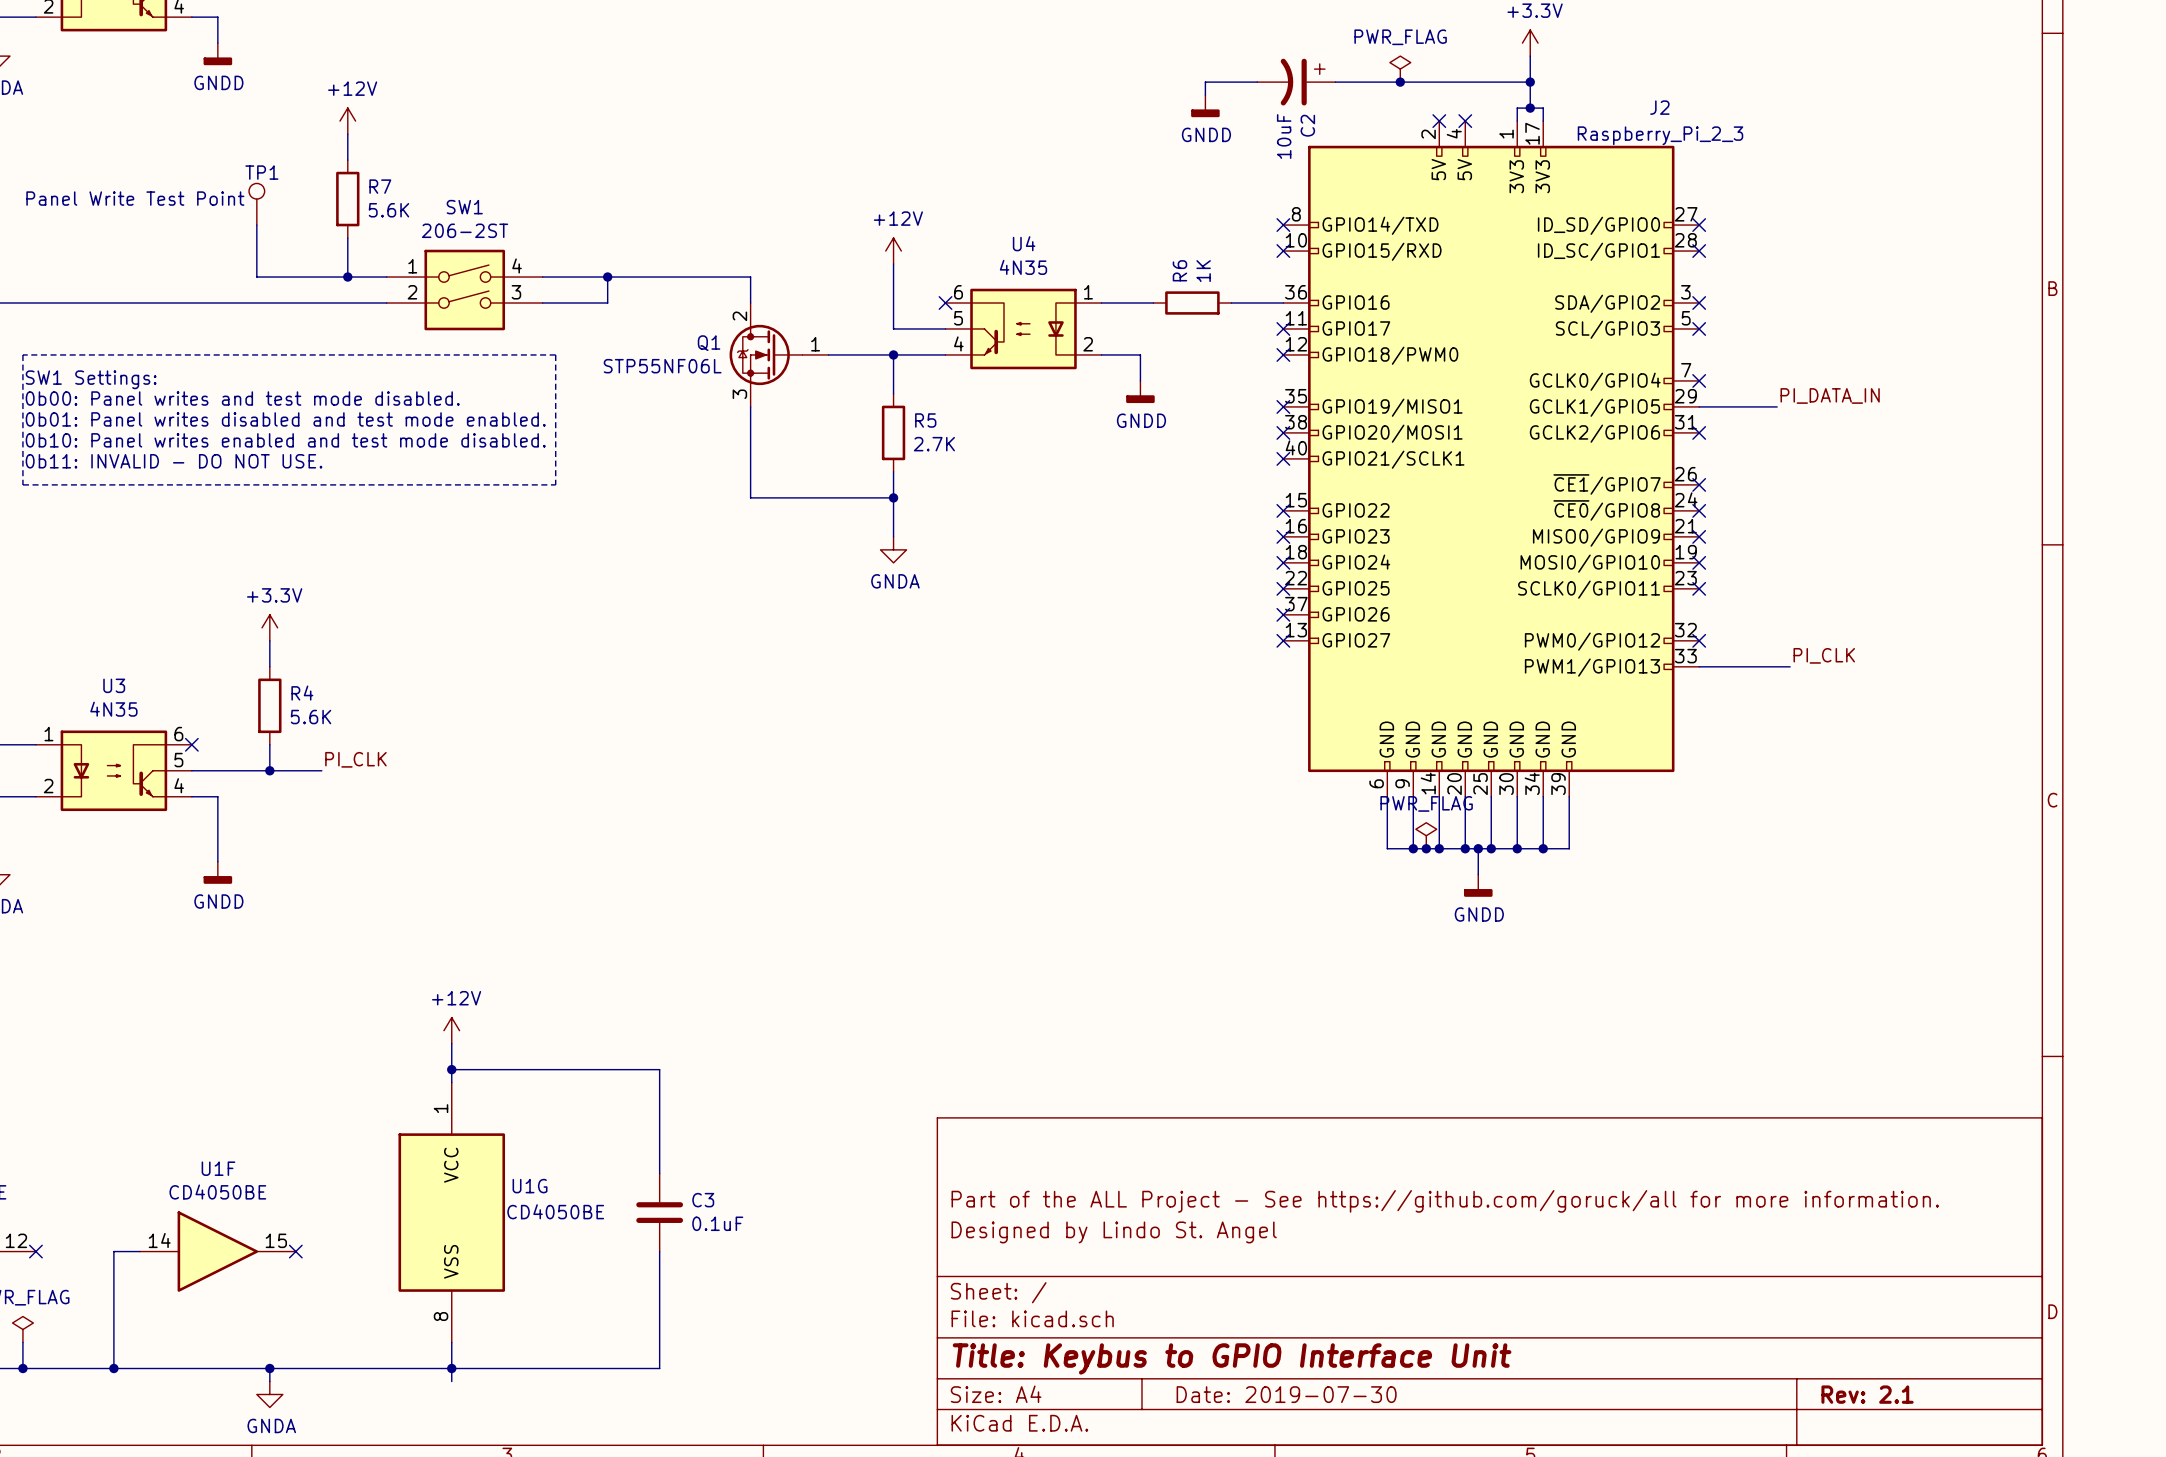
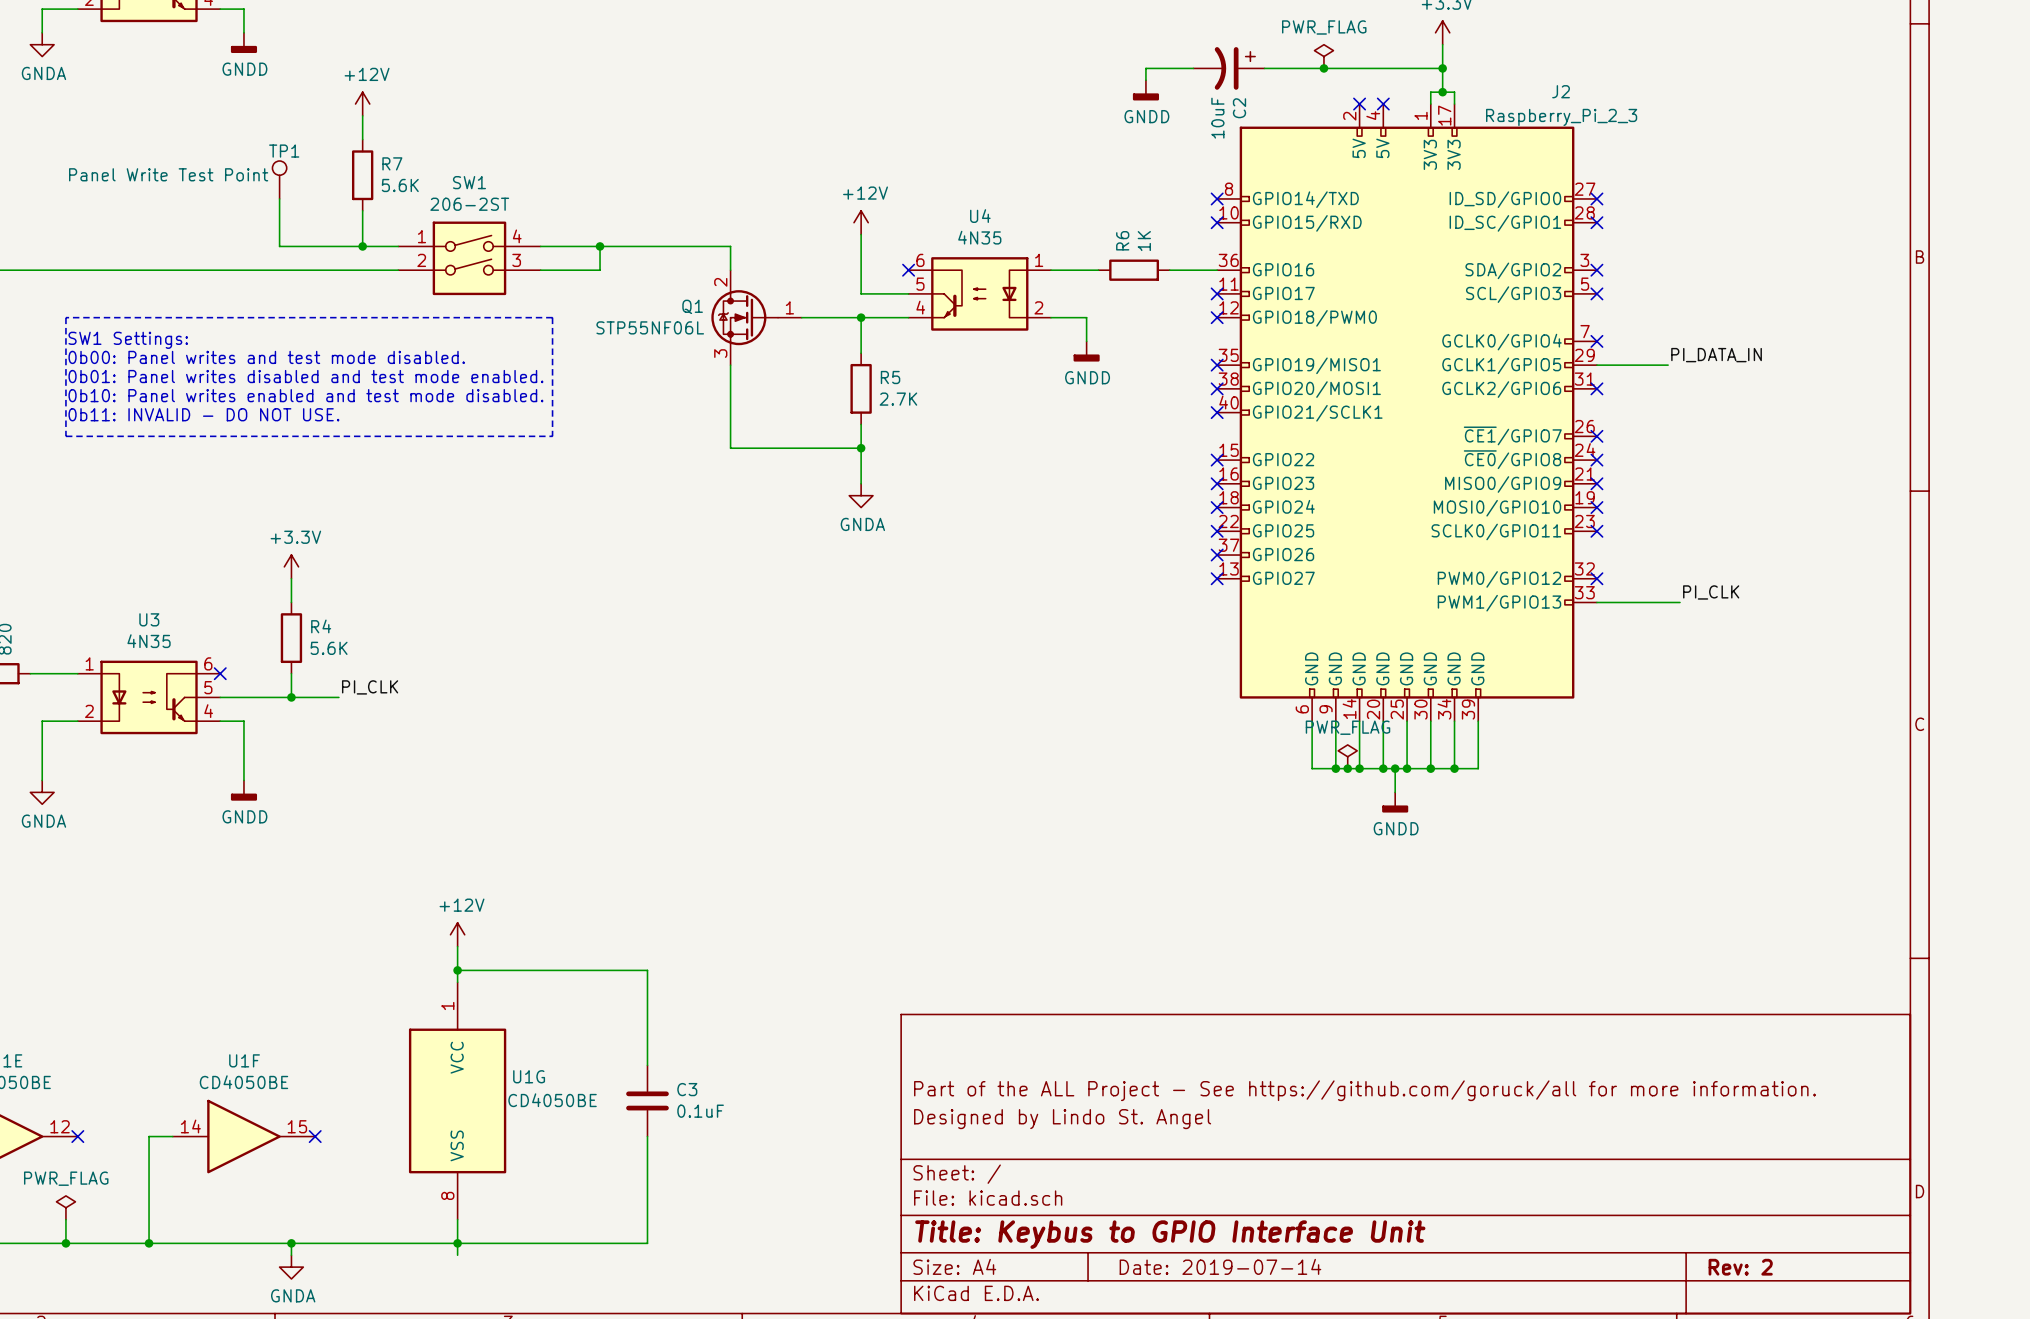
title block: Date: 2019-07-30 (1286, 1394) -> Date: 2019-07-14 (1220, 1266)
title block: Rev: 2.1 (1867, 1394) -> Rev: 2 (1740, 1267)

